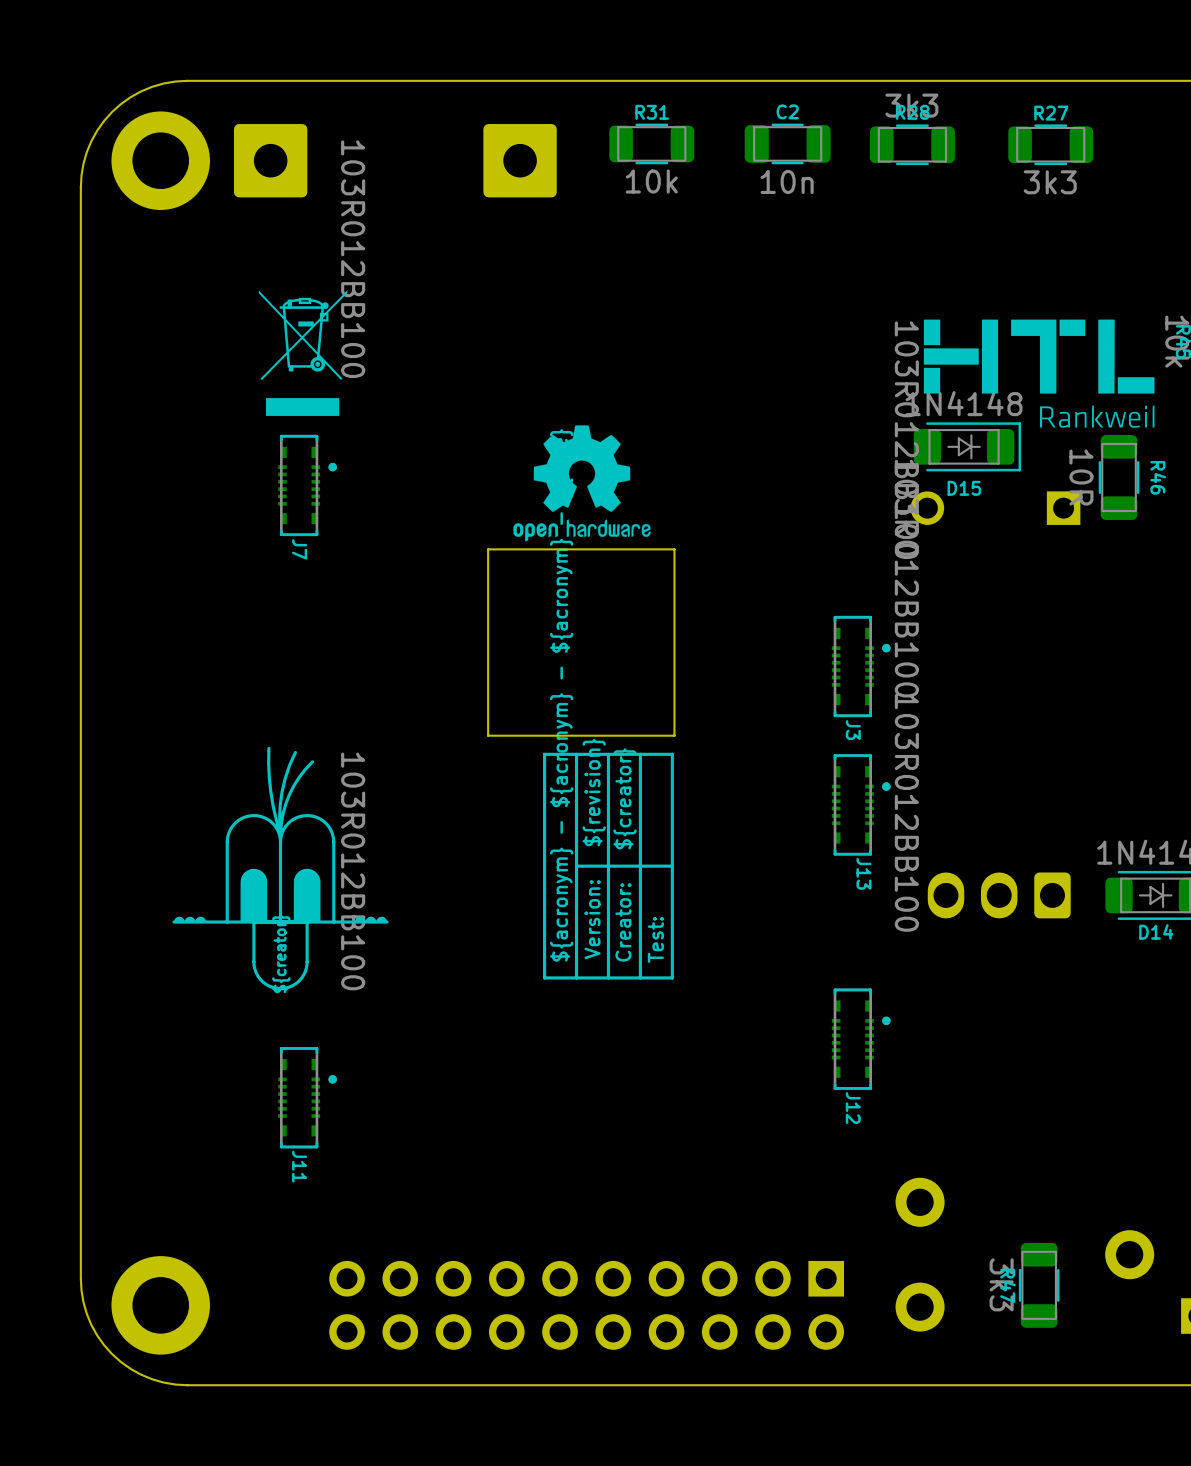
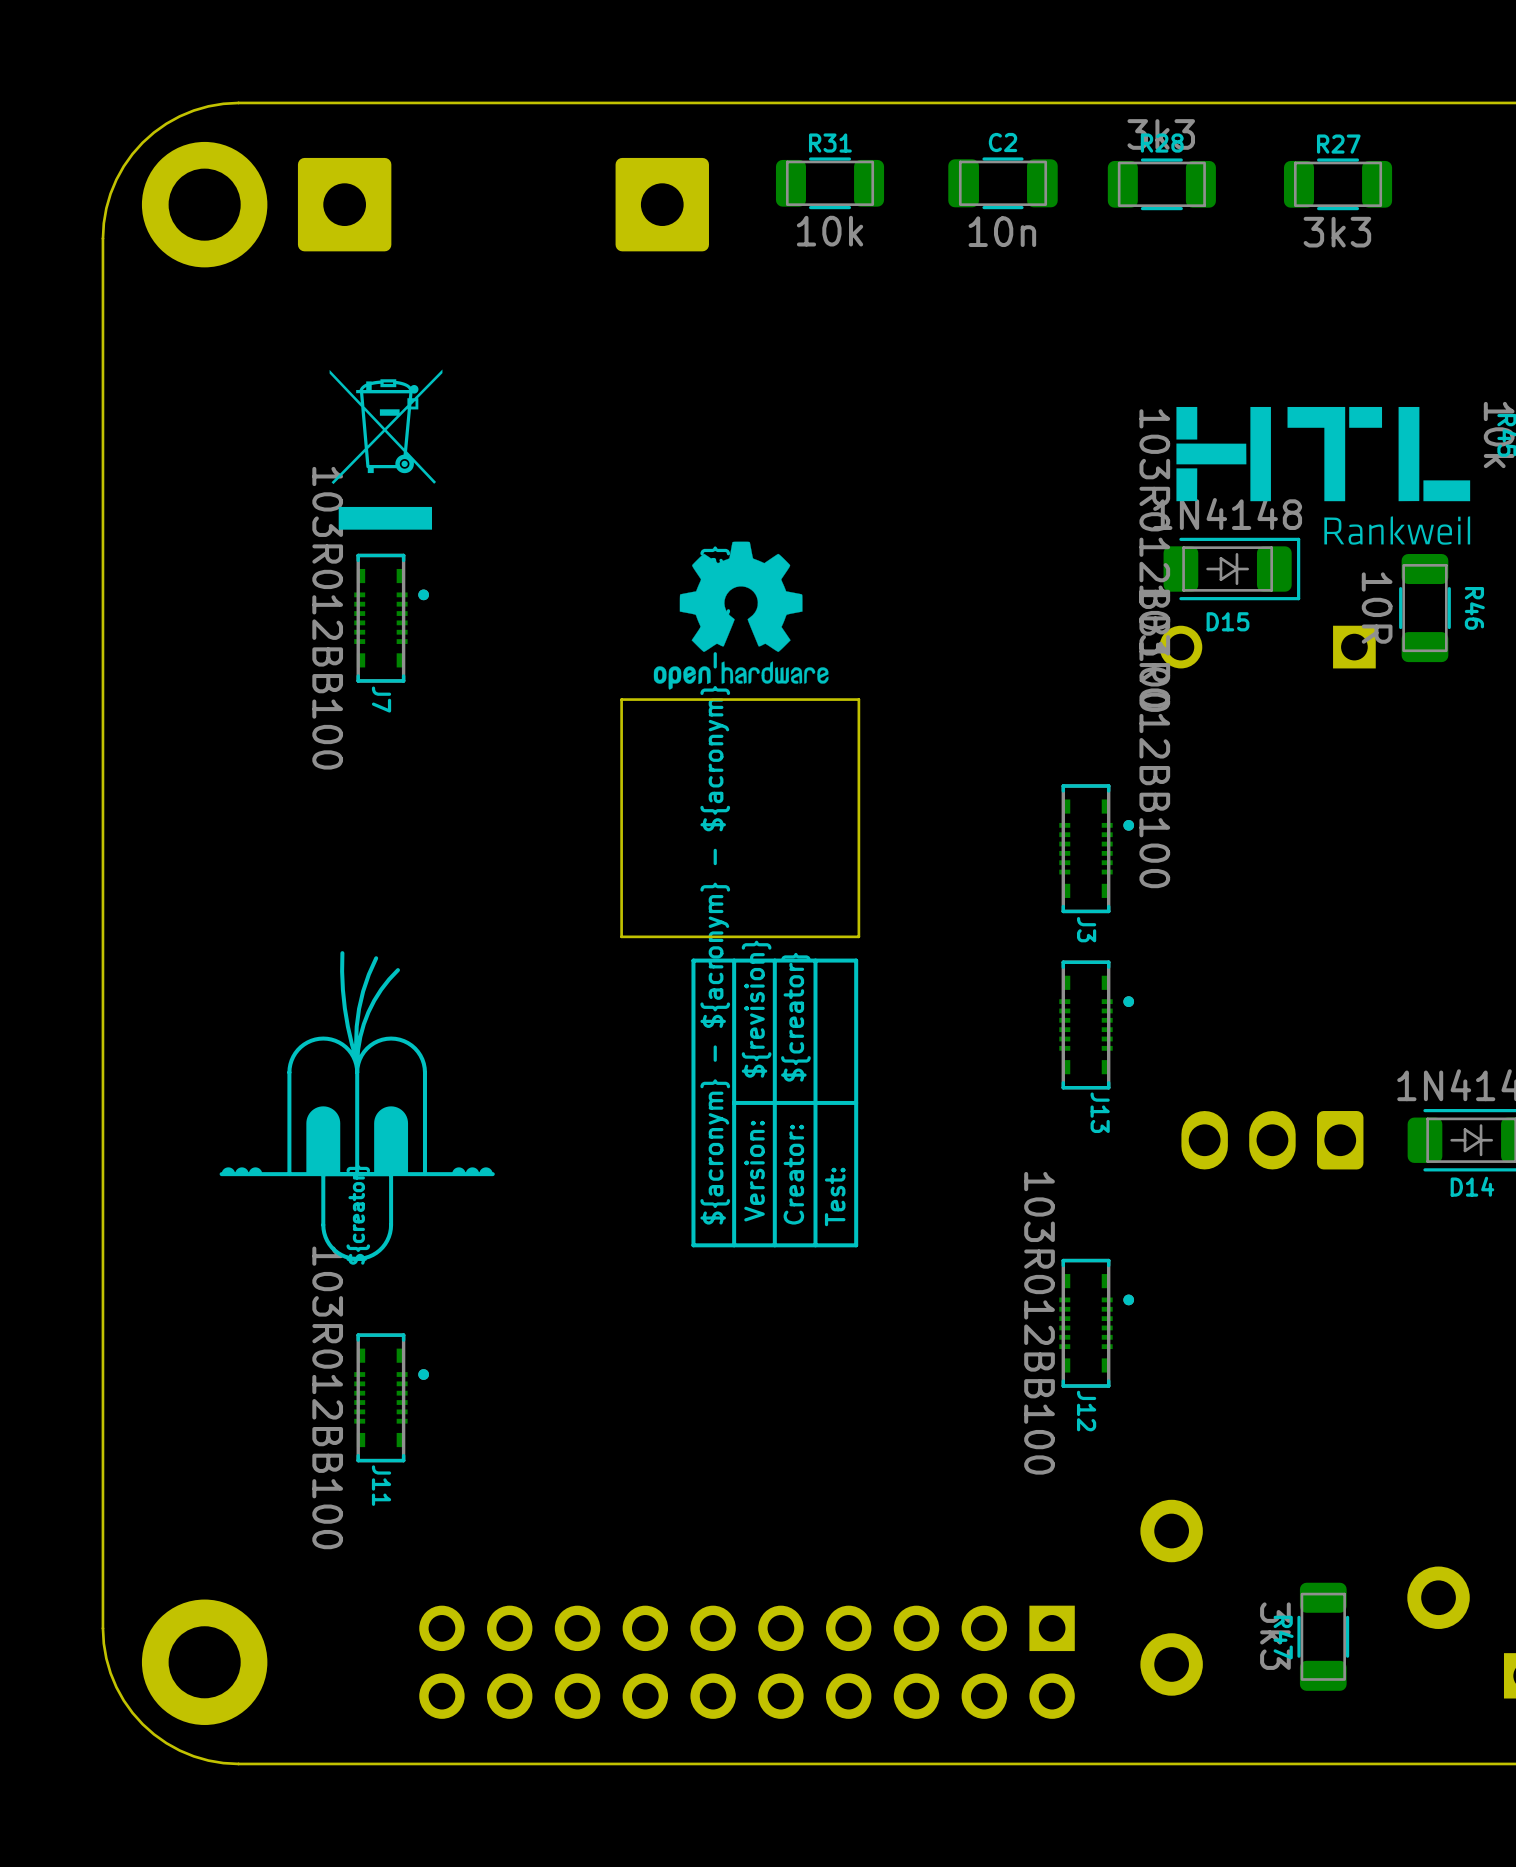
J7 value position: 103R012BB100 (353, 259) -> 103R012BB100 (327, 618)
J12 value position: 103R012BB100 (906, 812) -> 103R012BB100 (1039, 1323)
J11 value position: 103R012BB100 (353, 871) -> 103R012BB100 (327, 1397)

